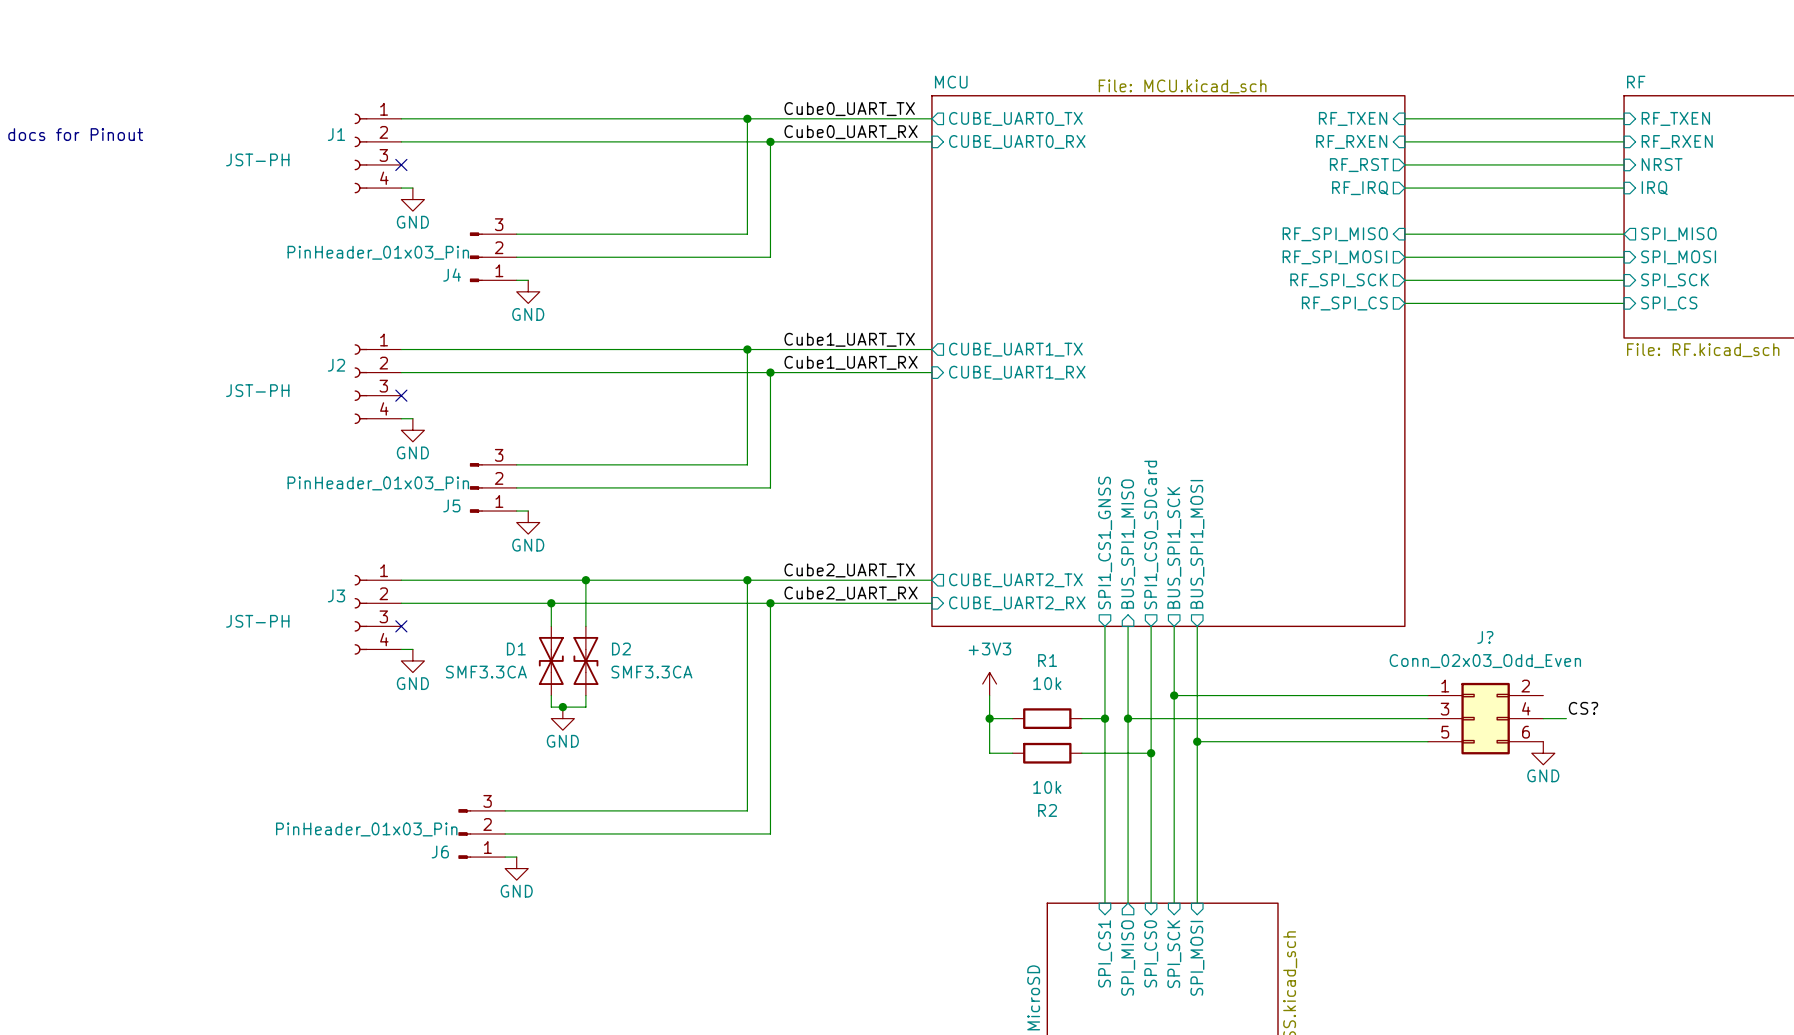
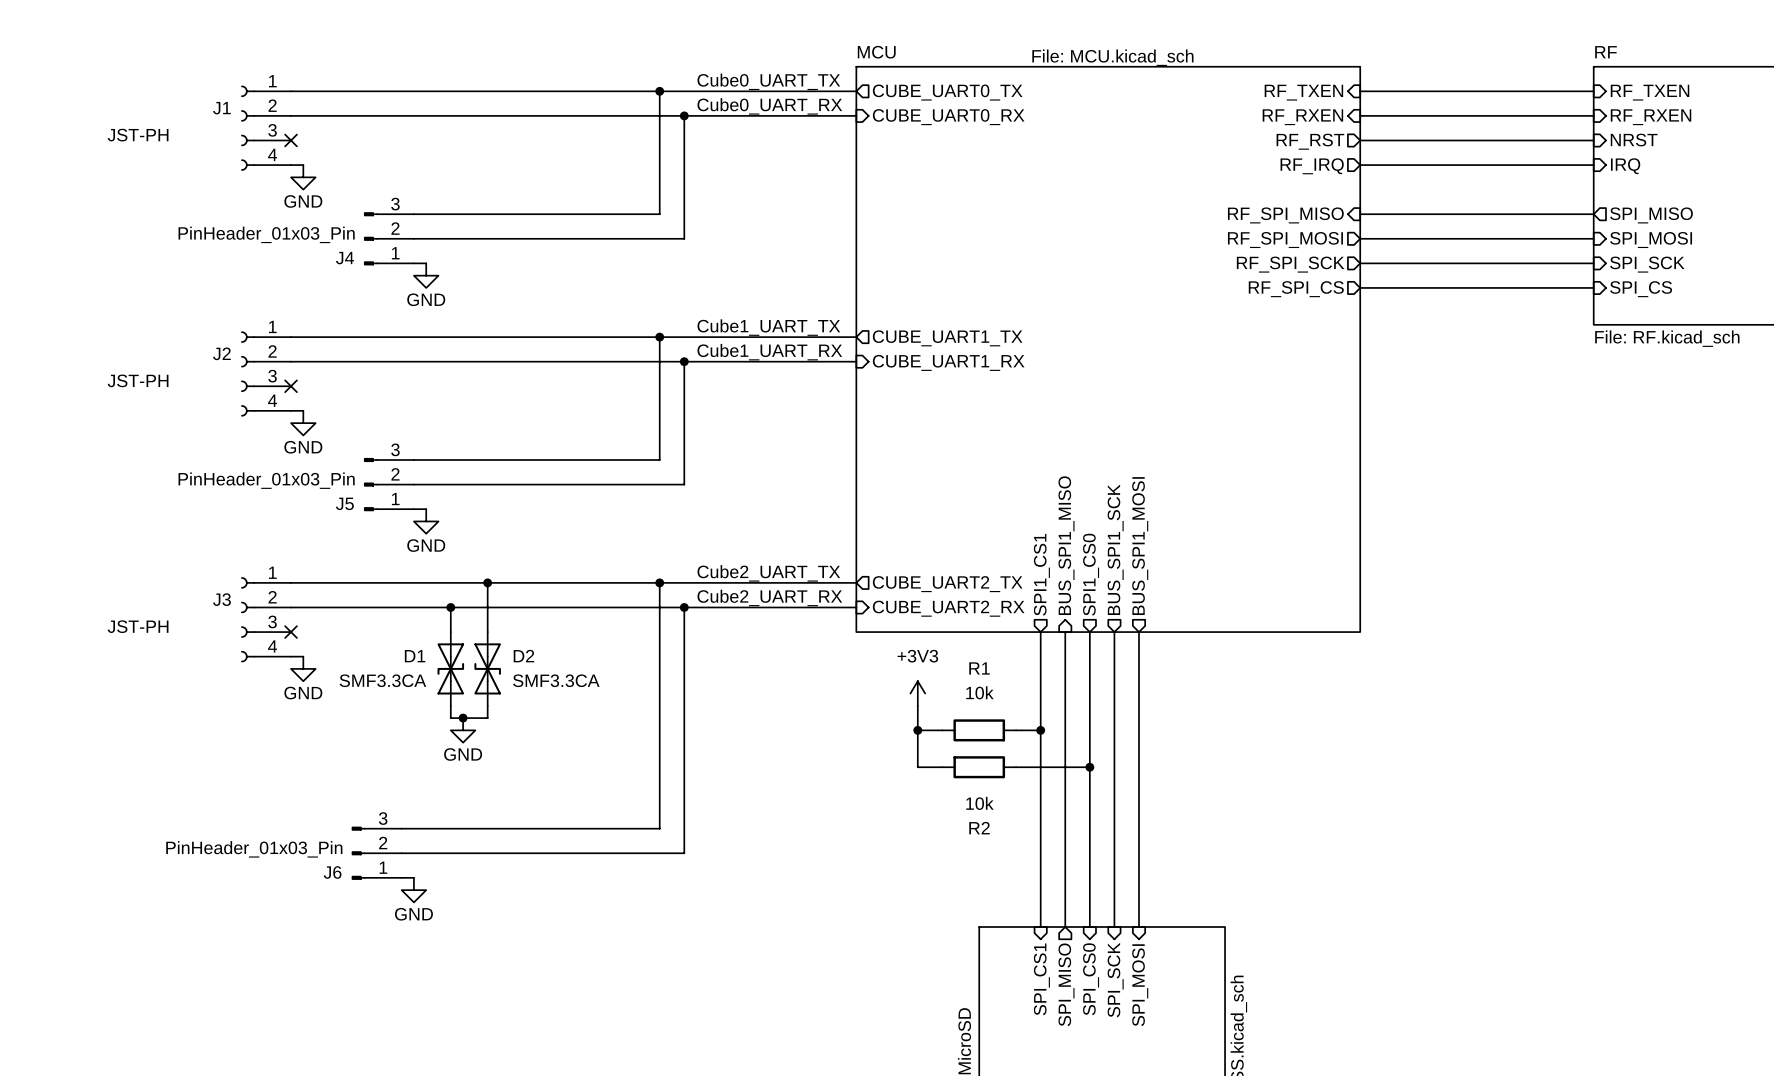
sheet pin: SPI1_CS0_SDCard (1151, 535) -> SPI1_CS0 (1091, 574)
sheet pin: SPI1_CS1_GNSS (1105, 542) -> SPI1_CS1 (1041, 574)
wire: (1174, 695) (1427, 695) -> none
junction: (1174, 695) -> none
label: CS? (1583, 708) -> none
wire: (1128, 718) (1427, 718) -> none
junction: (1128, 718) -> none
J?: Conn_02x03_Odd_Even (1485, 718) -> none
wire: (1543, 718) (1566, 718) -> none
wire: (1197, 741) (1427, 741) -> none
junction: (1197, 741) -> none
power symbol: GND (1543, 753) -> none

